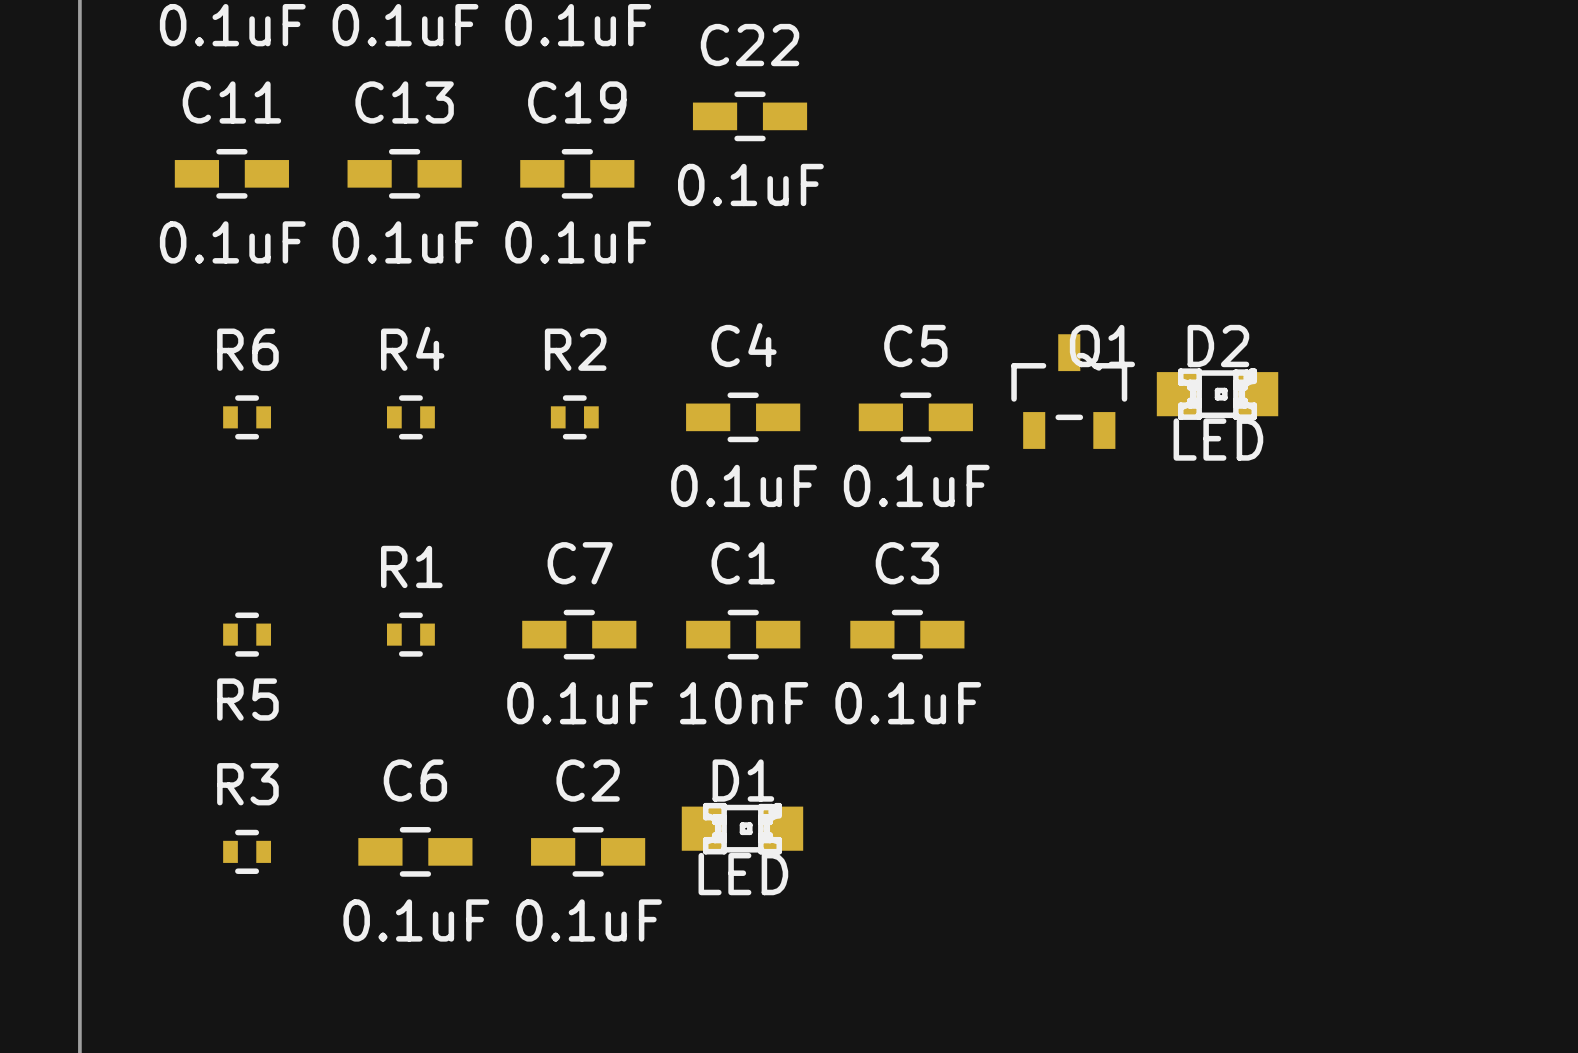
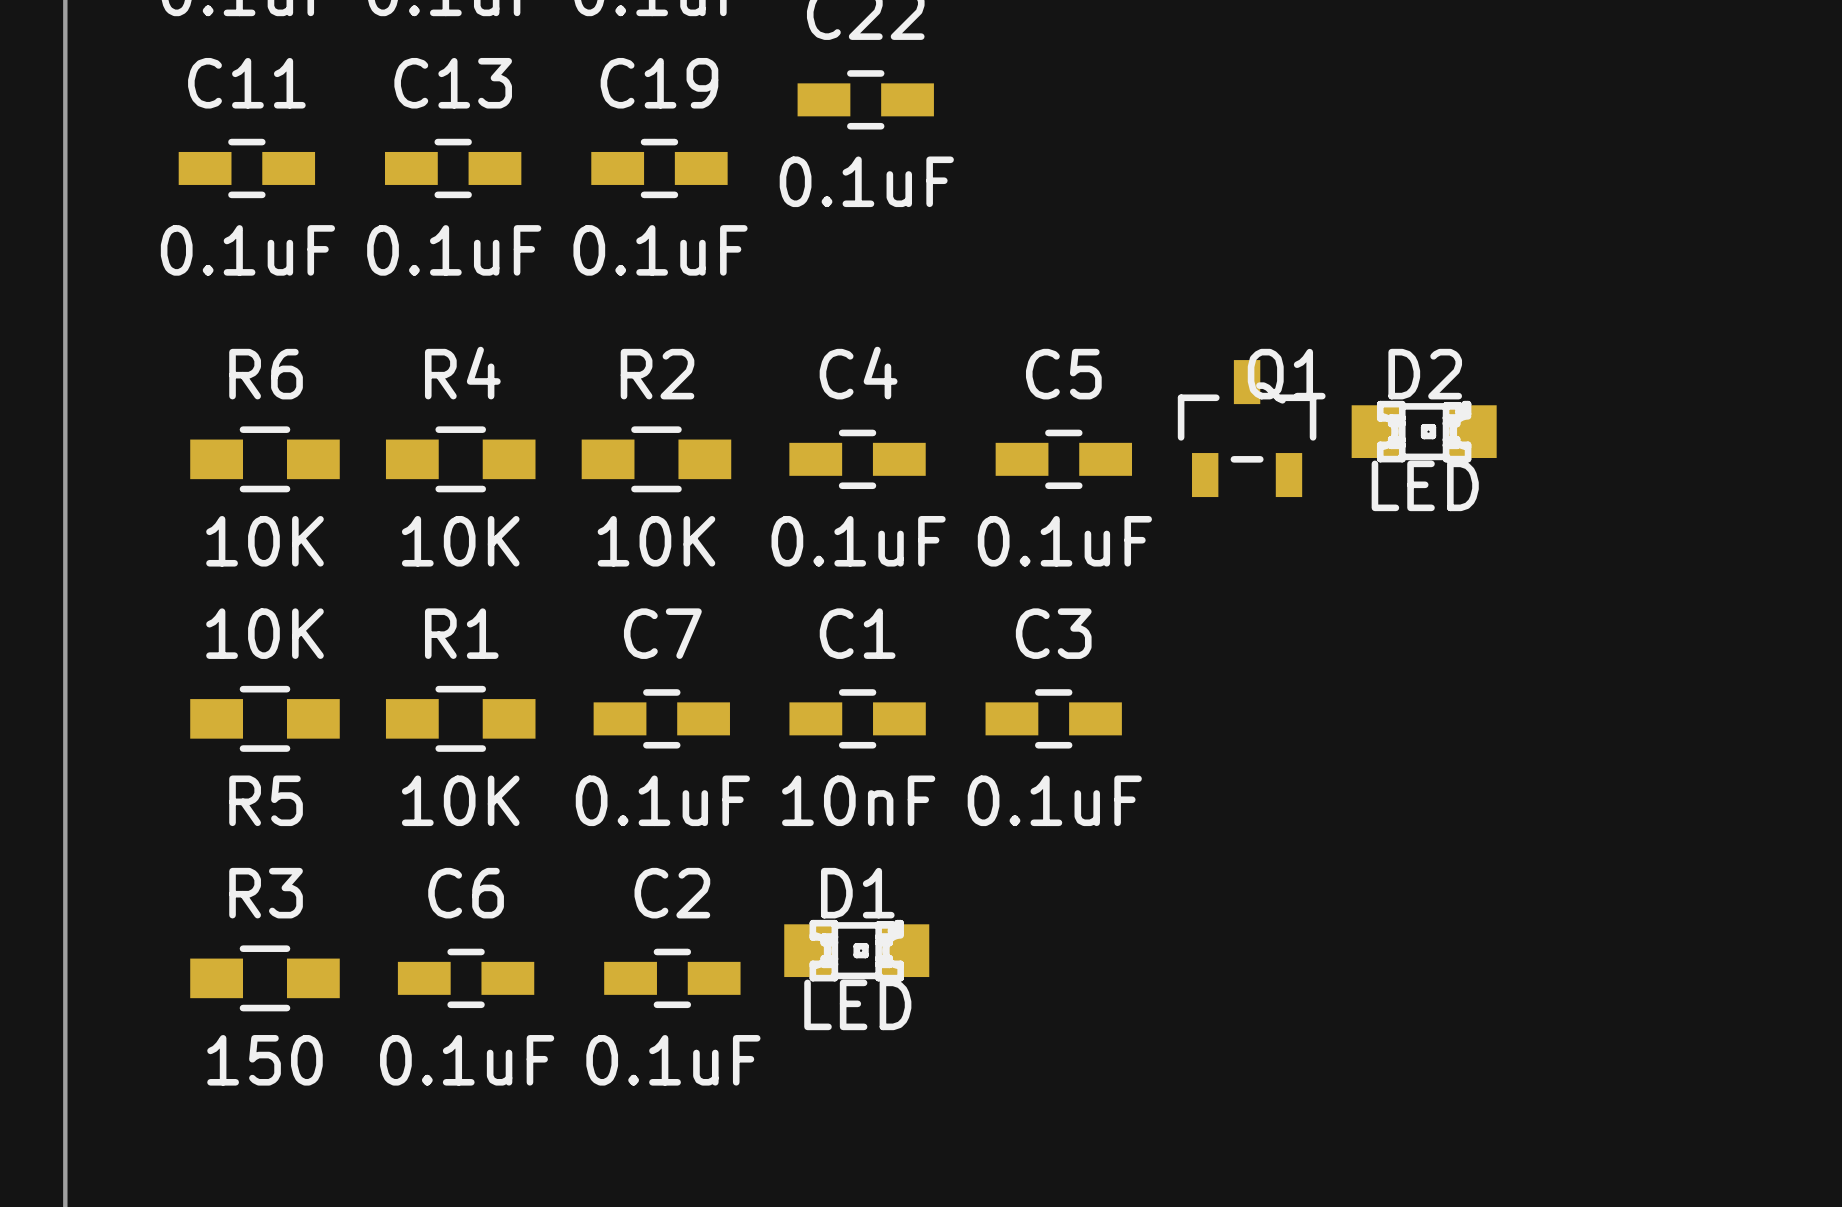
R6 footprint: [223, 395, 272, 440] -> [190, 426, 340, 493]
R4 footprint: [387, 395, 435, 440] -> [385, 426, 536, 493]
R2 footprint: [550, 395, 599, 440] -> [581, 426, 732, 493]
R6 value: none -> 10K (264, 541)
R4 value: none -> 10K (460, 541)
R2 value: none -> 10K (656, 541)
R5 value: none -> 10K (264, 633)
R5 footprint: [223, 612, 272, 657] -> [190, 685, 340, 752]
R1 footprint: [387, 612, 435, 657] -> [385, 685, 536, 752]
R1 value: none -> 10K (460, 800)
R3 footprint: [223, 829, 272, 874] -> [190, 945, 340, 1012]
R3 value: none -> 150 (264, 1060)

